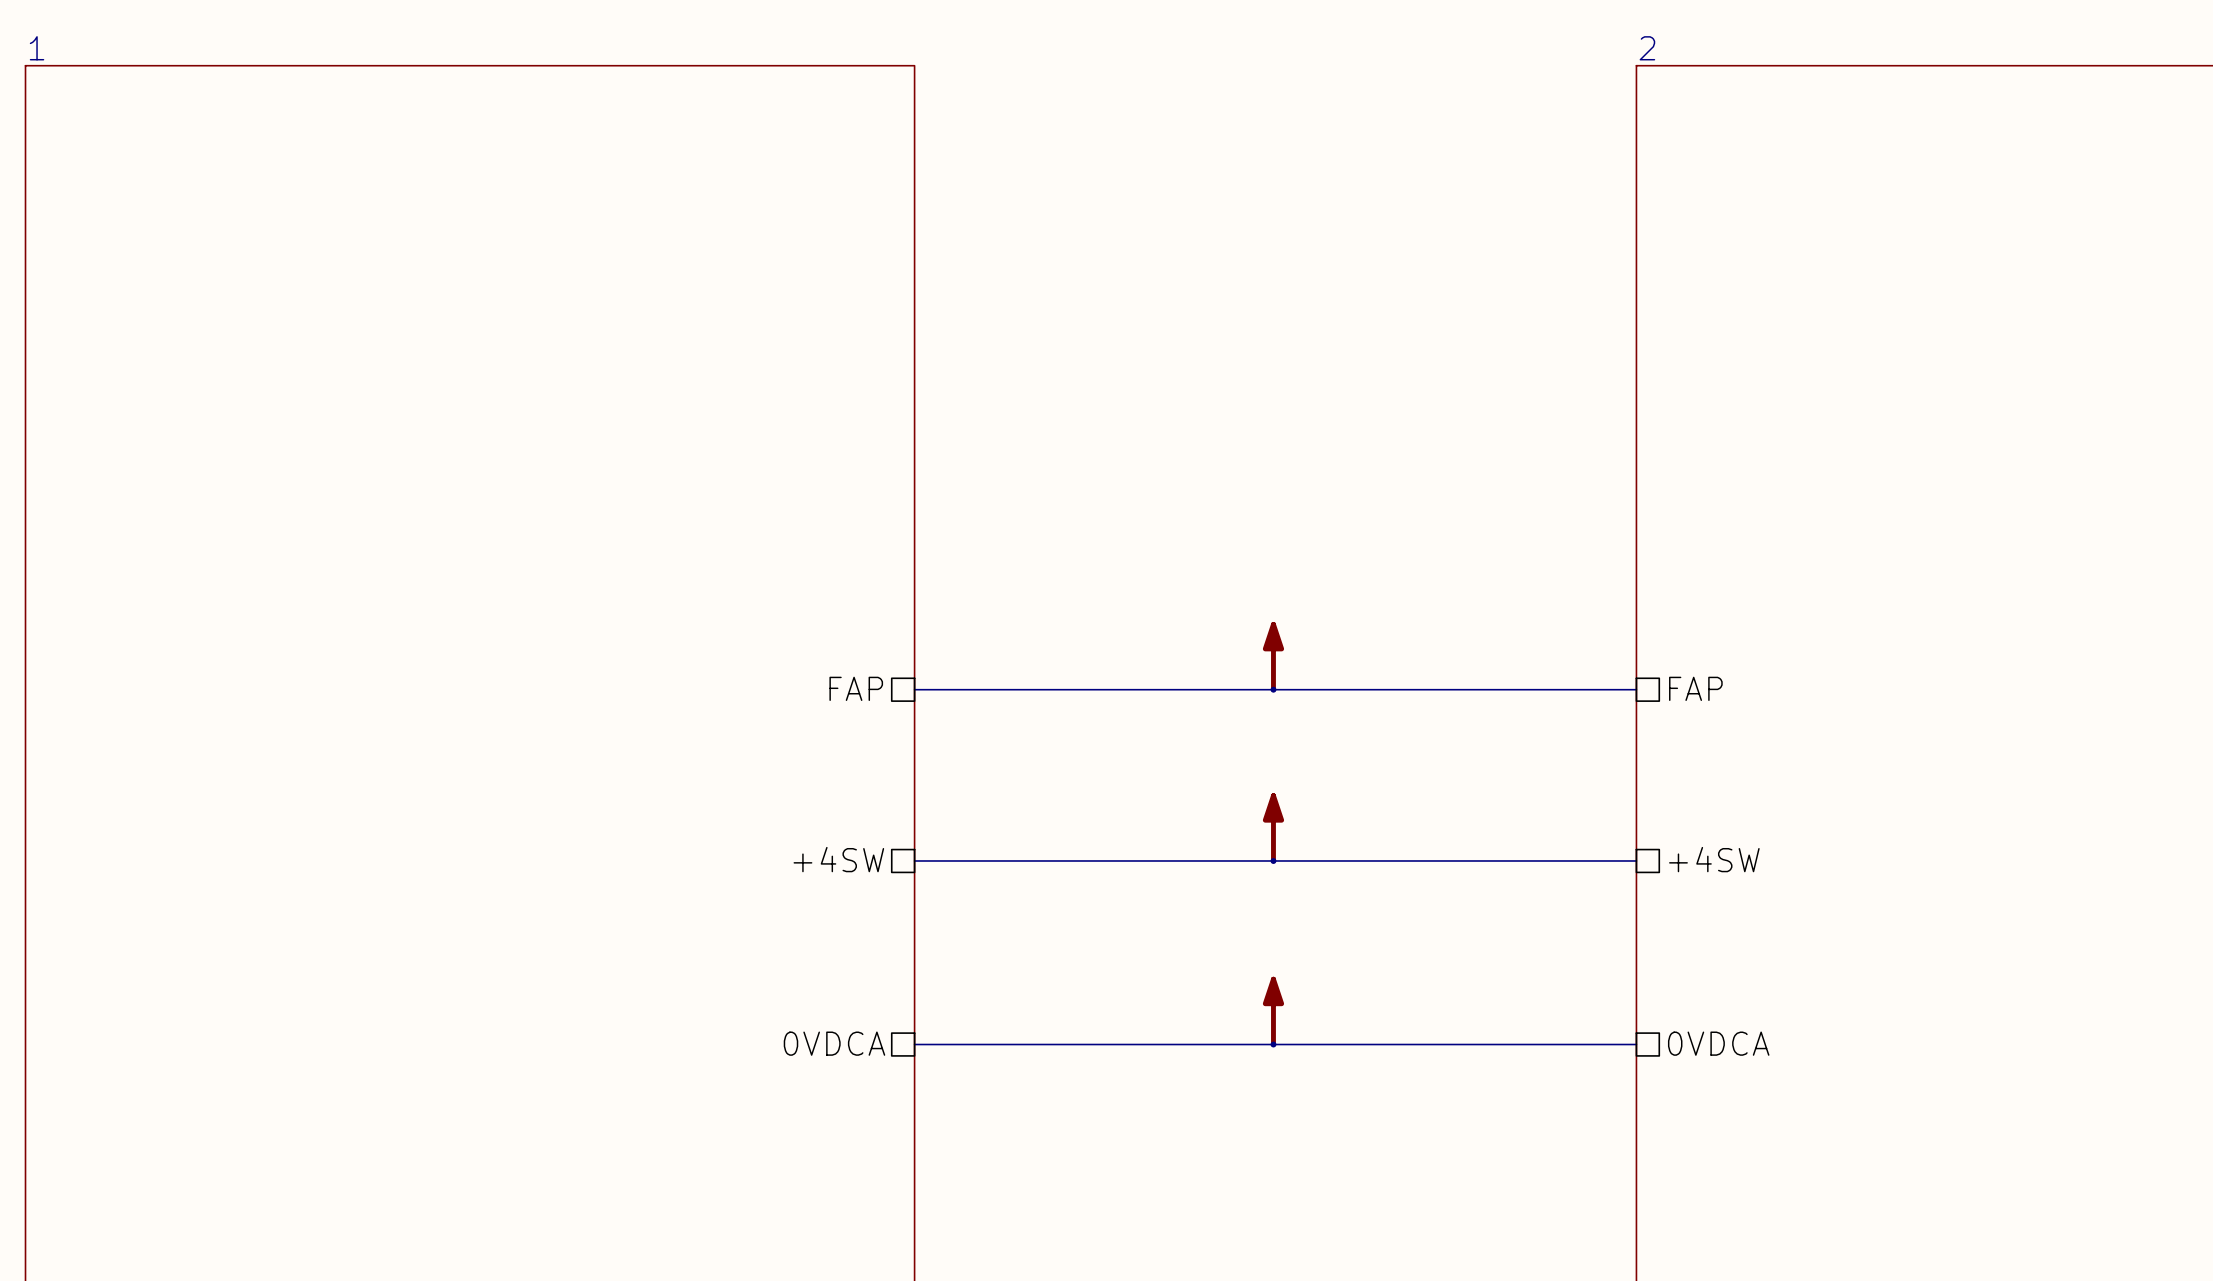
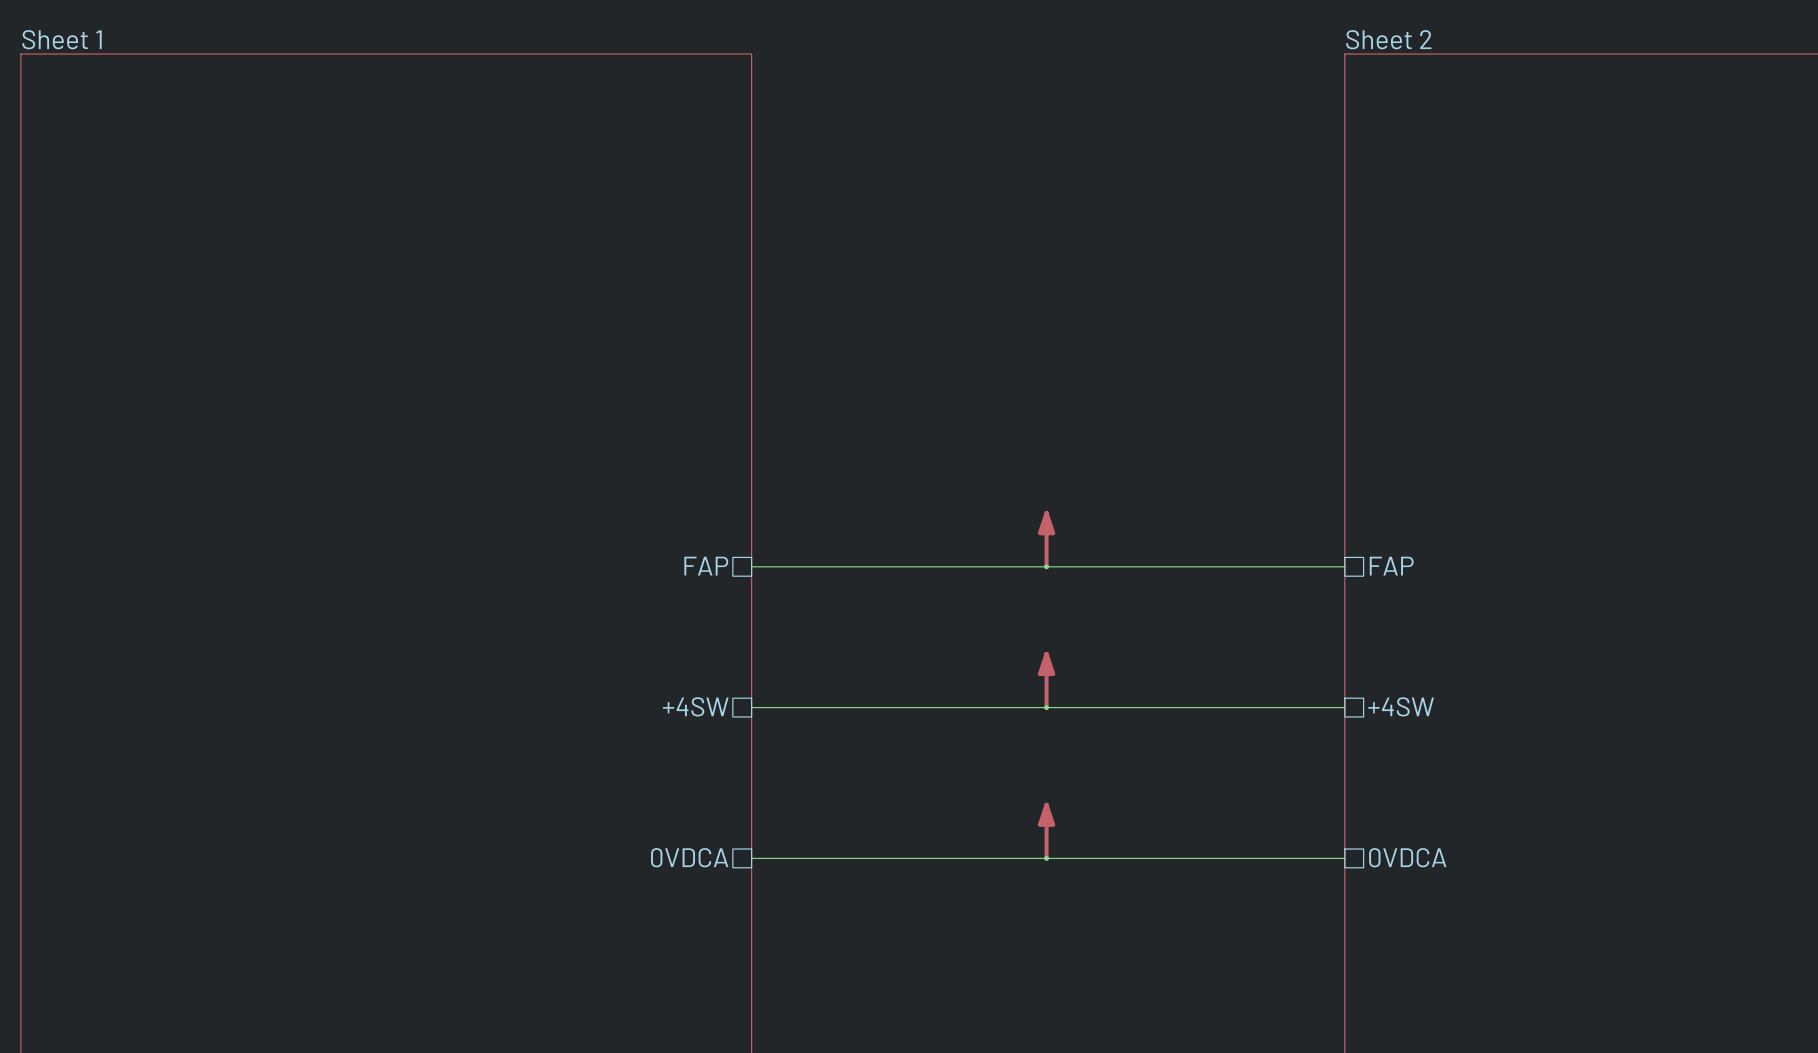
sheet 1 name: 1 (37, 48) -> Sheet 1 (62, 39)
sheet 2 name: 2 (1647, 48) -> Sheet 2 (1388, 39)

